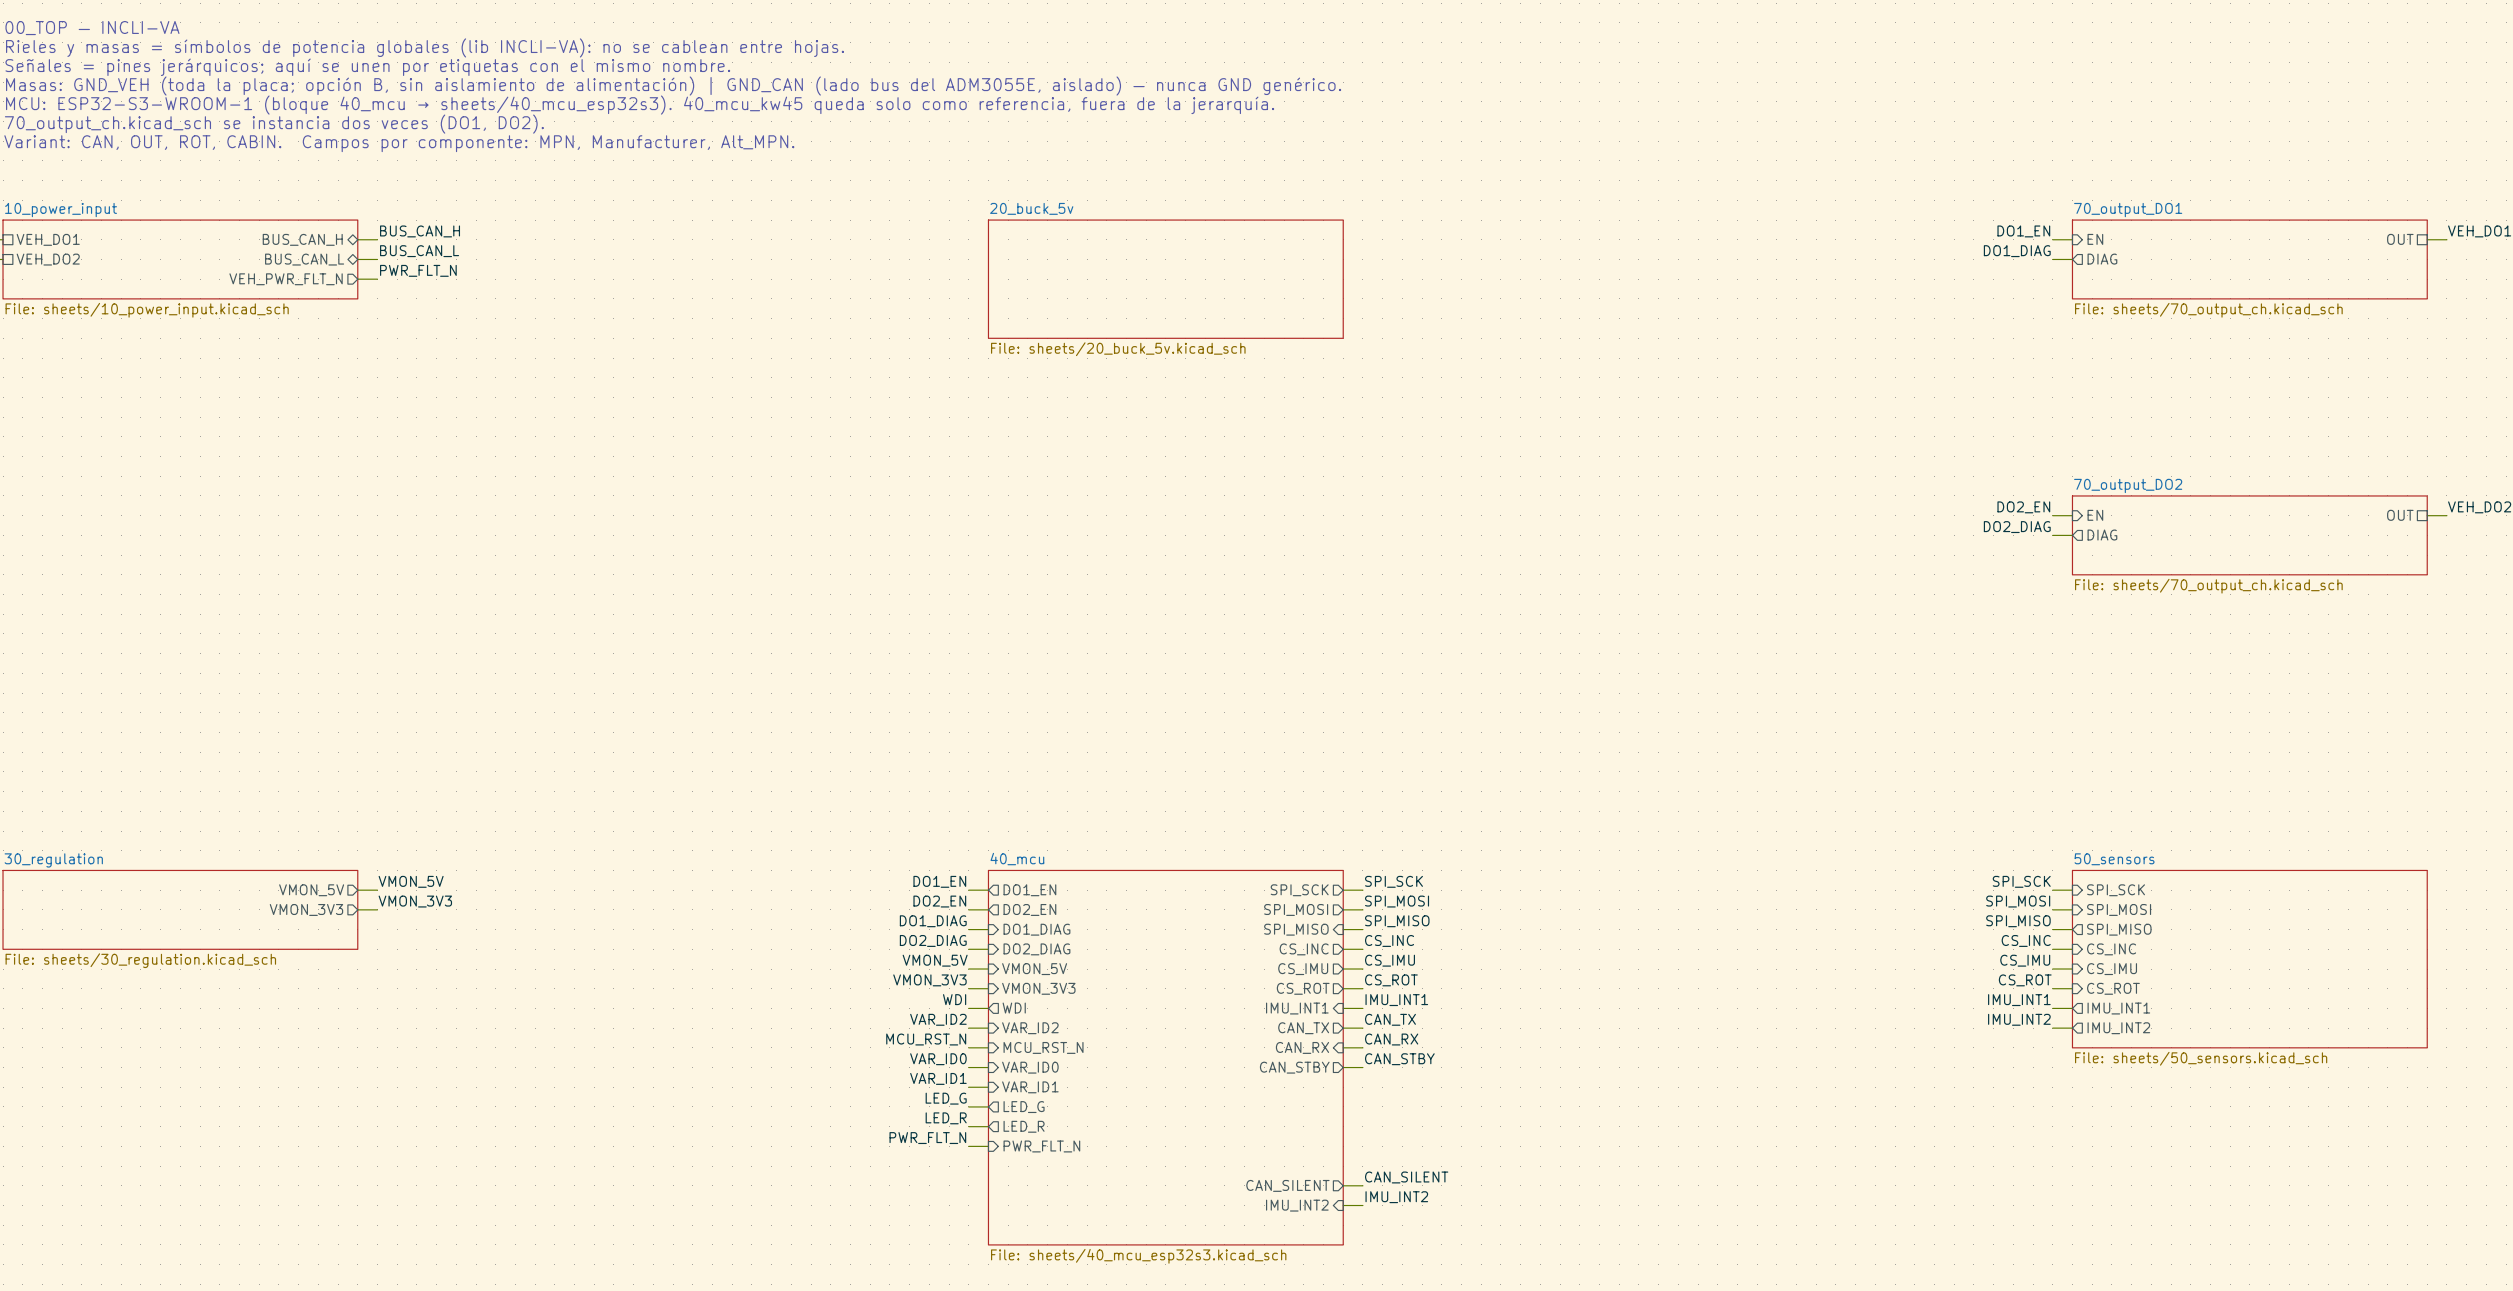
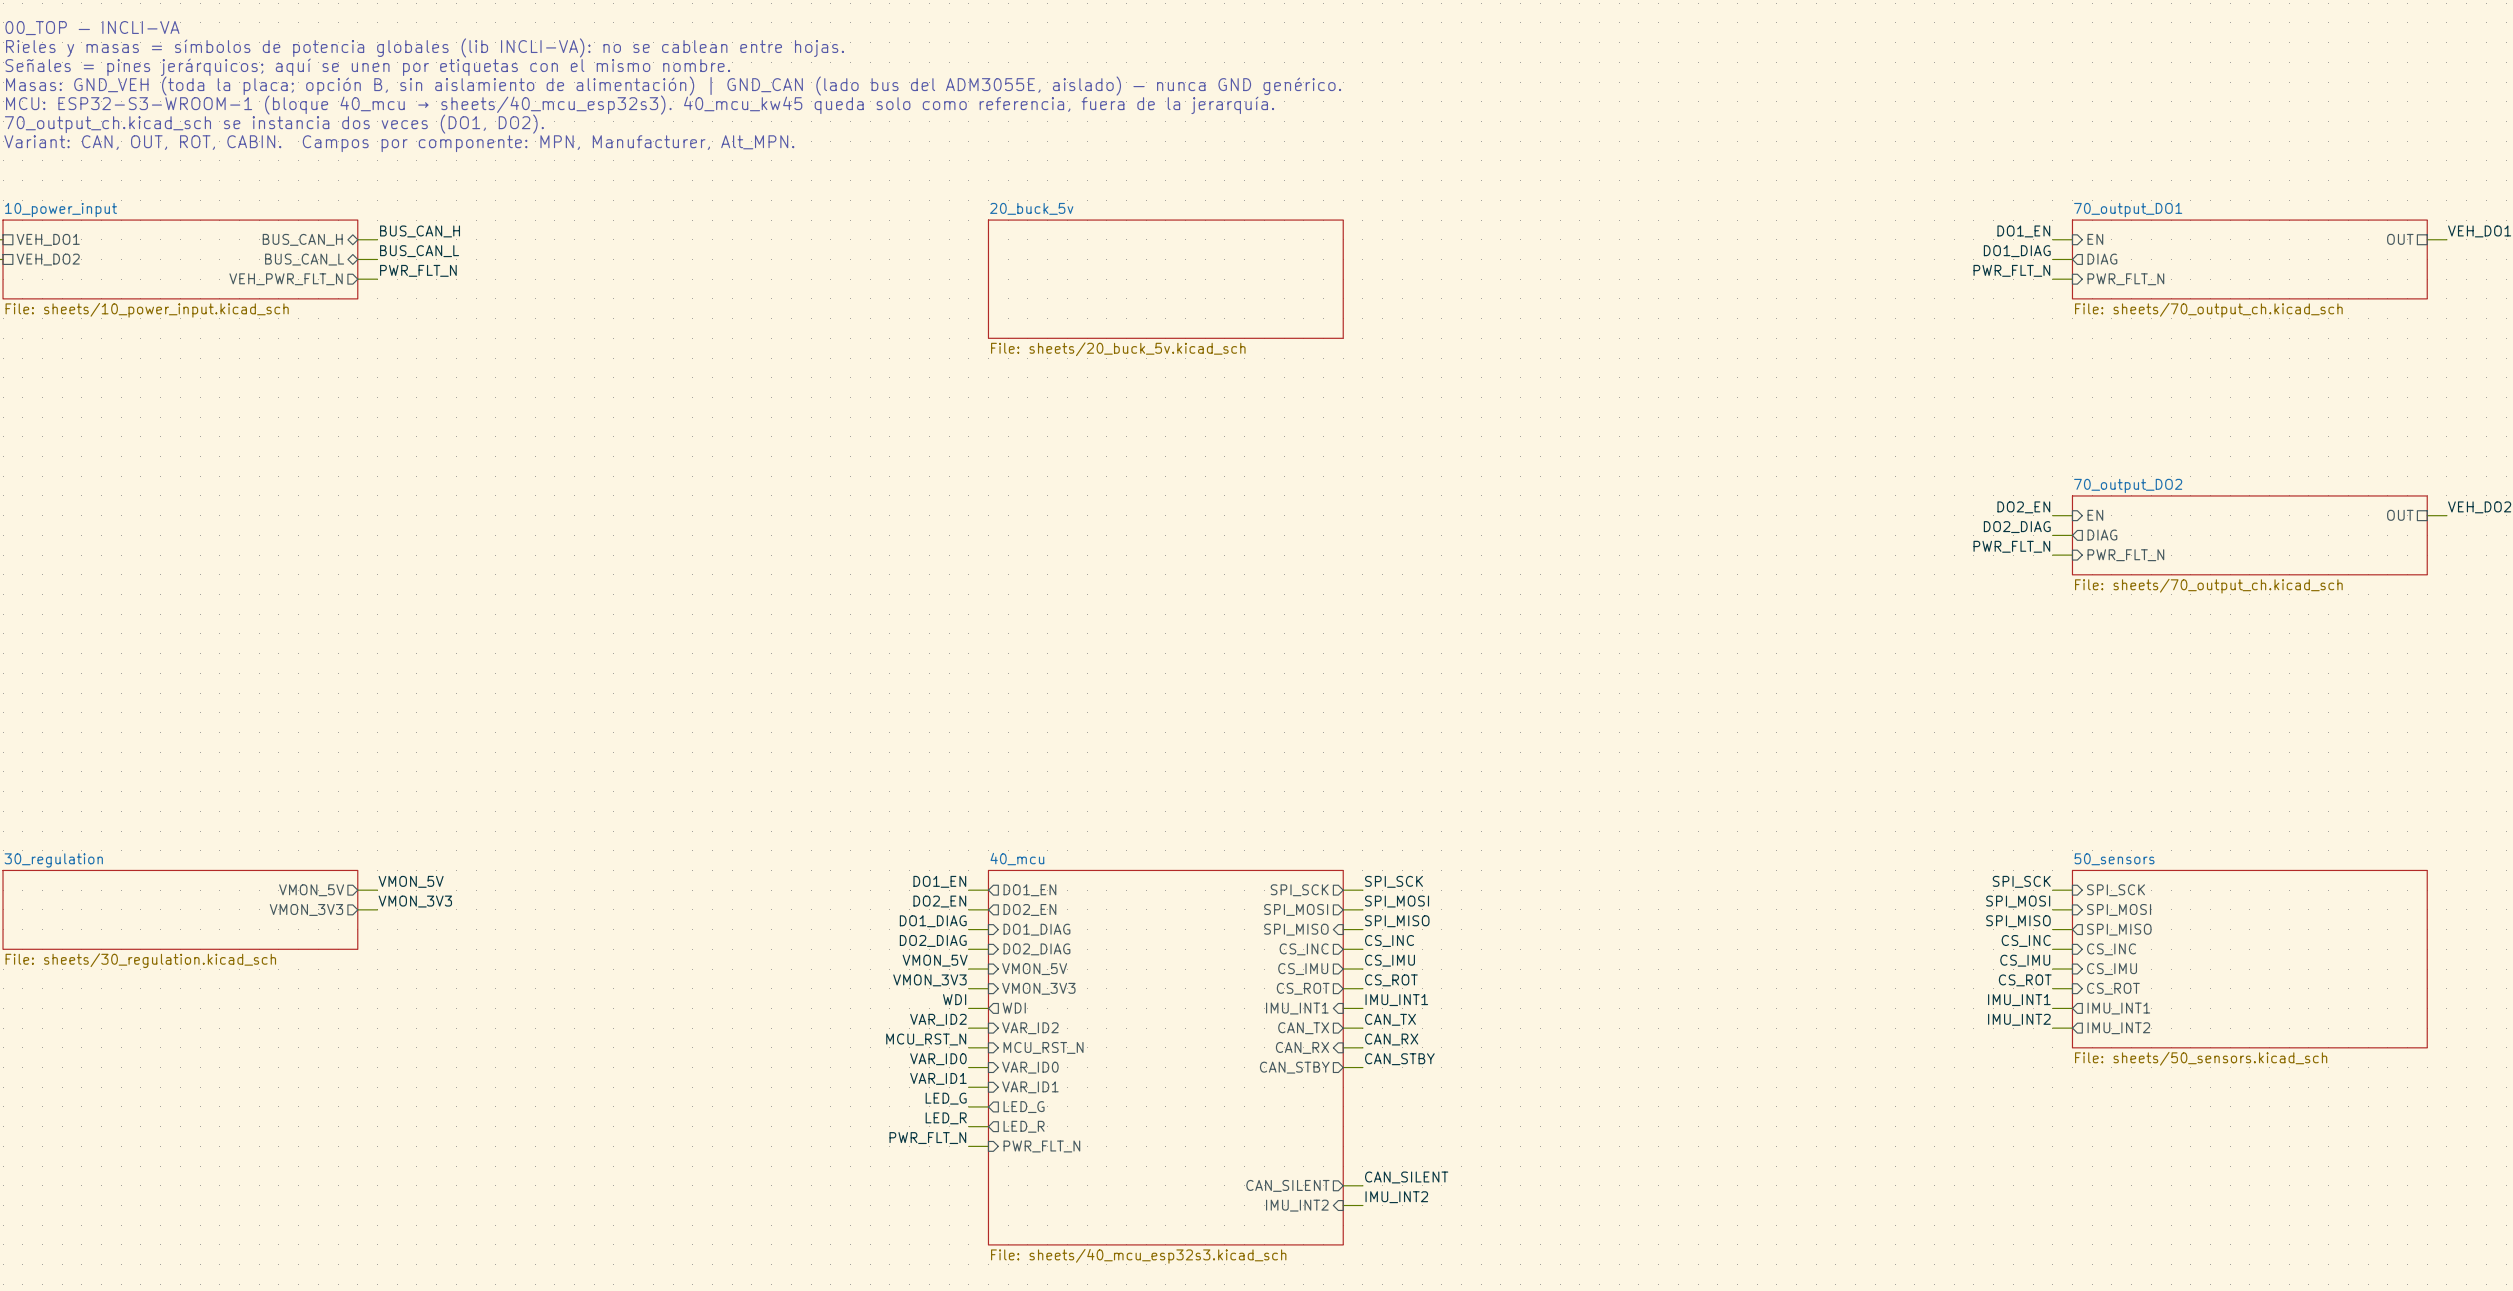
label: none -> PWR_FLT_N (2011, 270)
wire: none -> (2052, 279) (2072, 279)
sheet pin: none -> PWR_FLT_N (2125, 279)
label: none -> PWR_FLT_N (2011, 546)
wire: none -> (2052, 555) (2072, 555)
sheet pin: none -> PWR_FLT_N (2125, 555)

